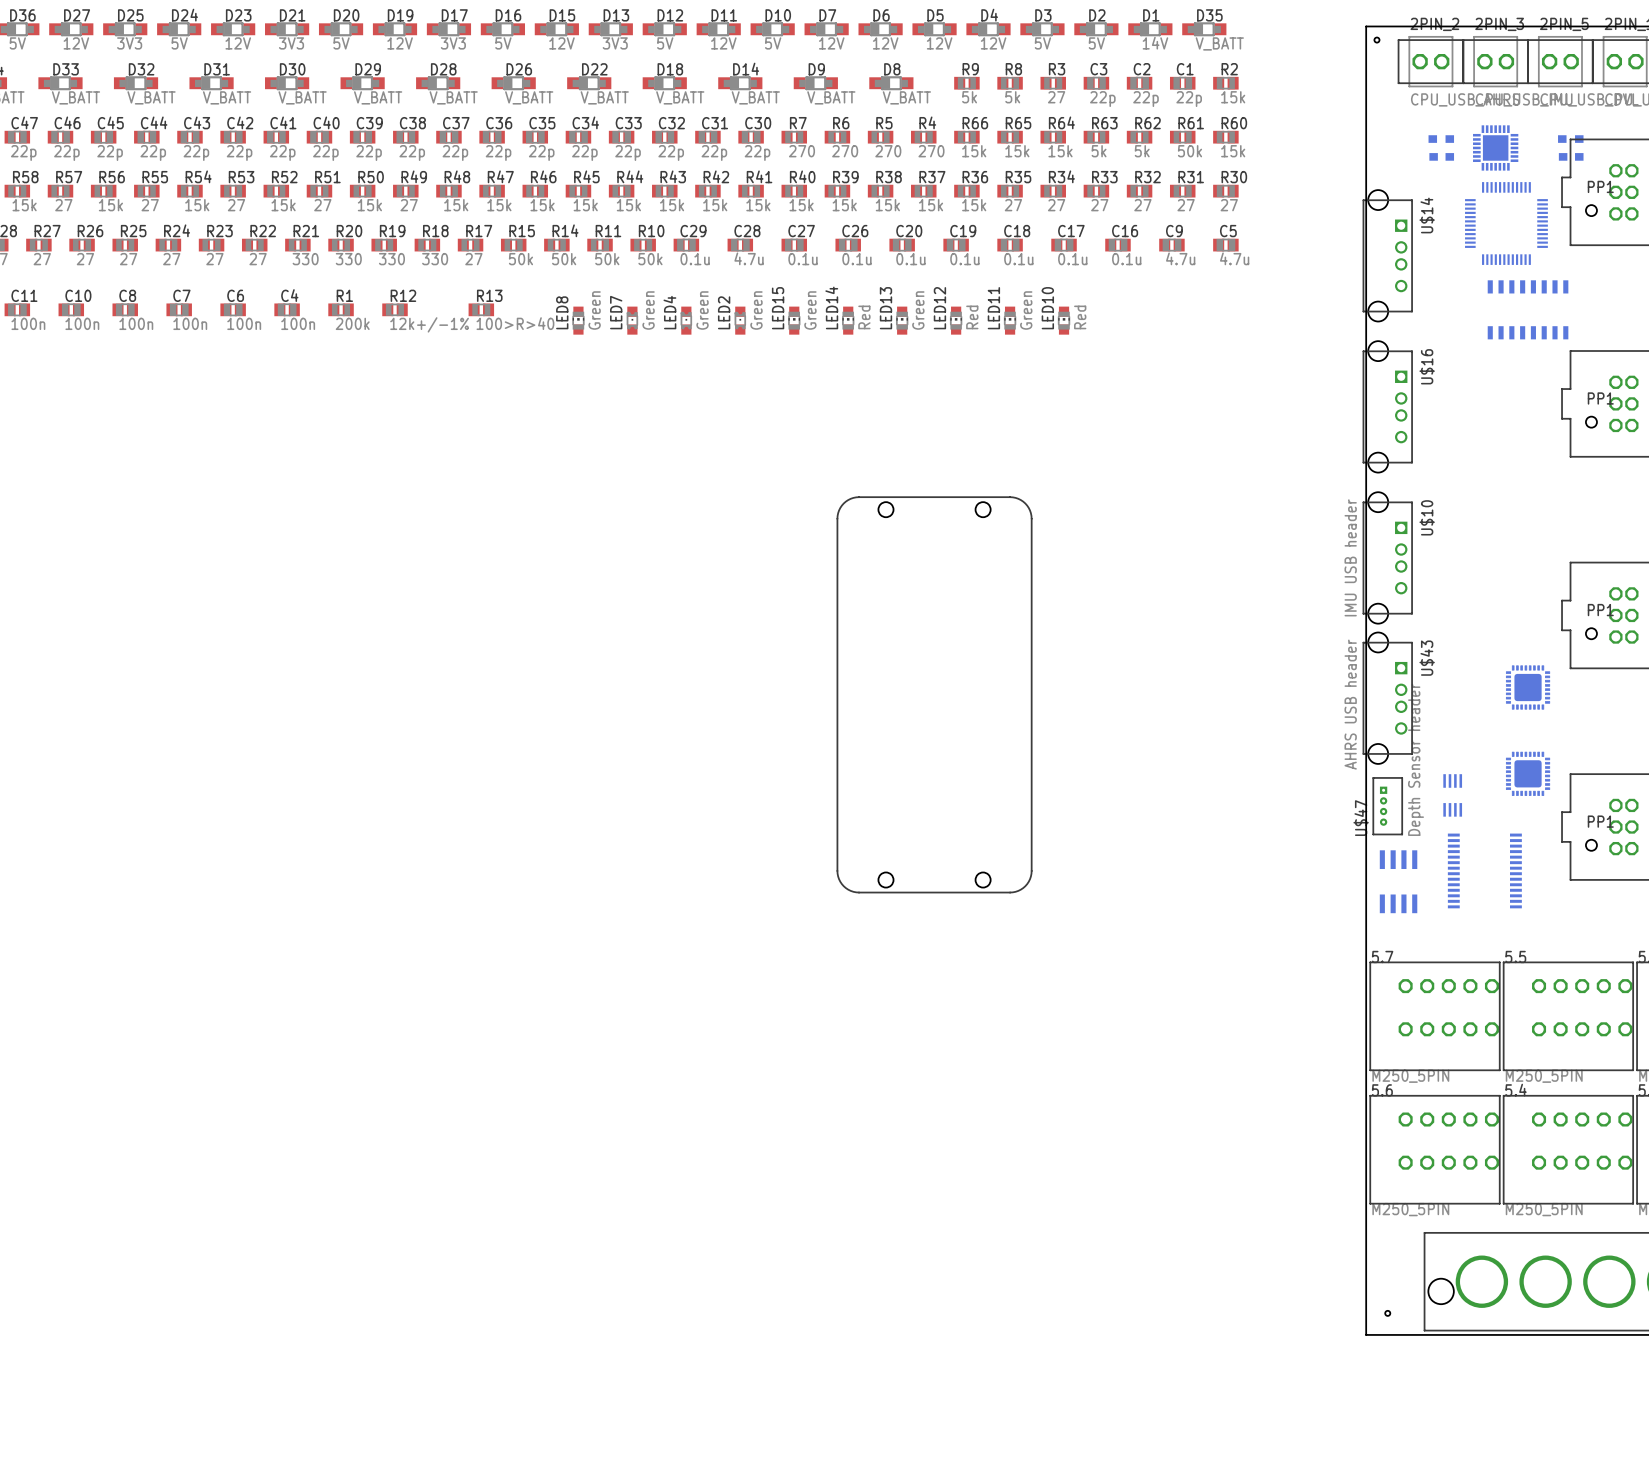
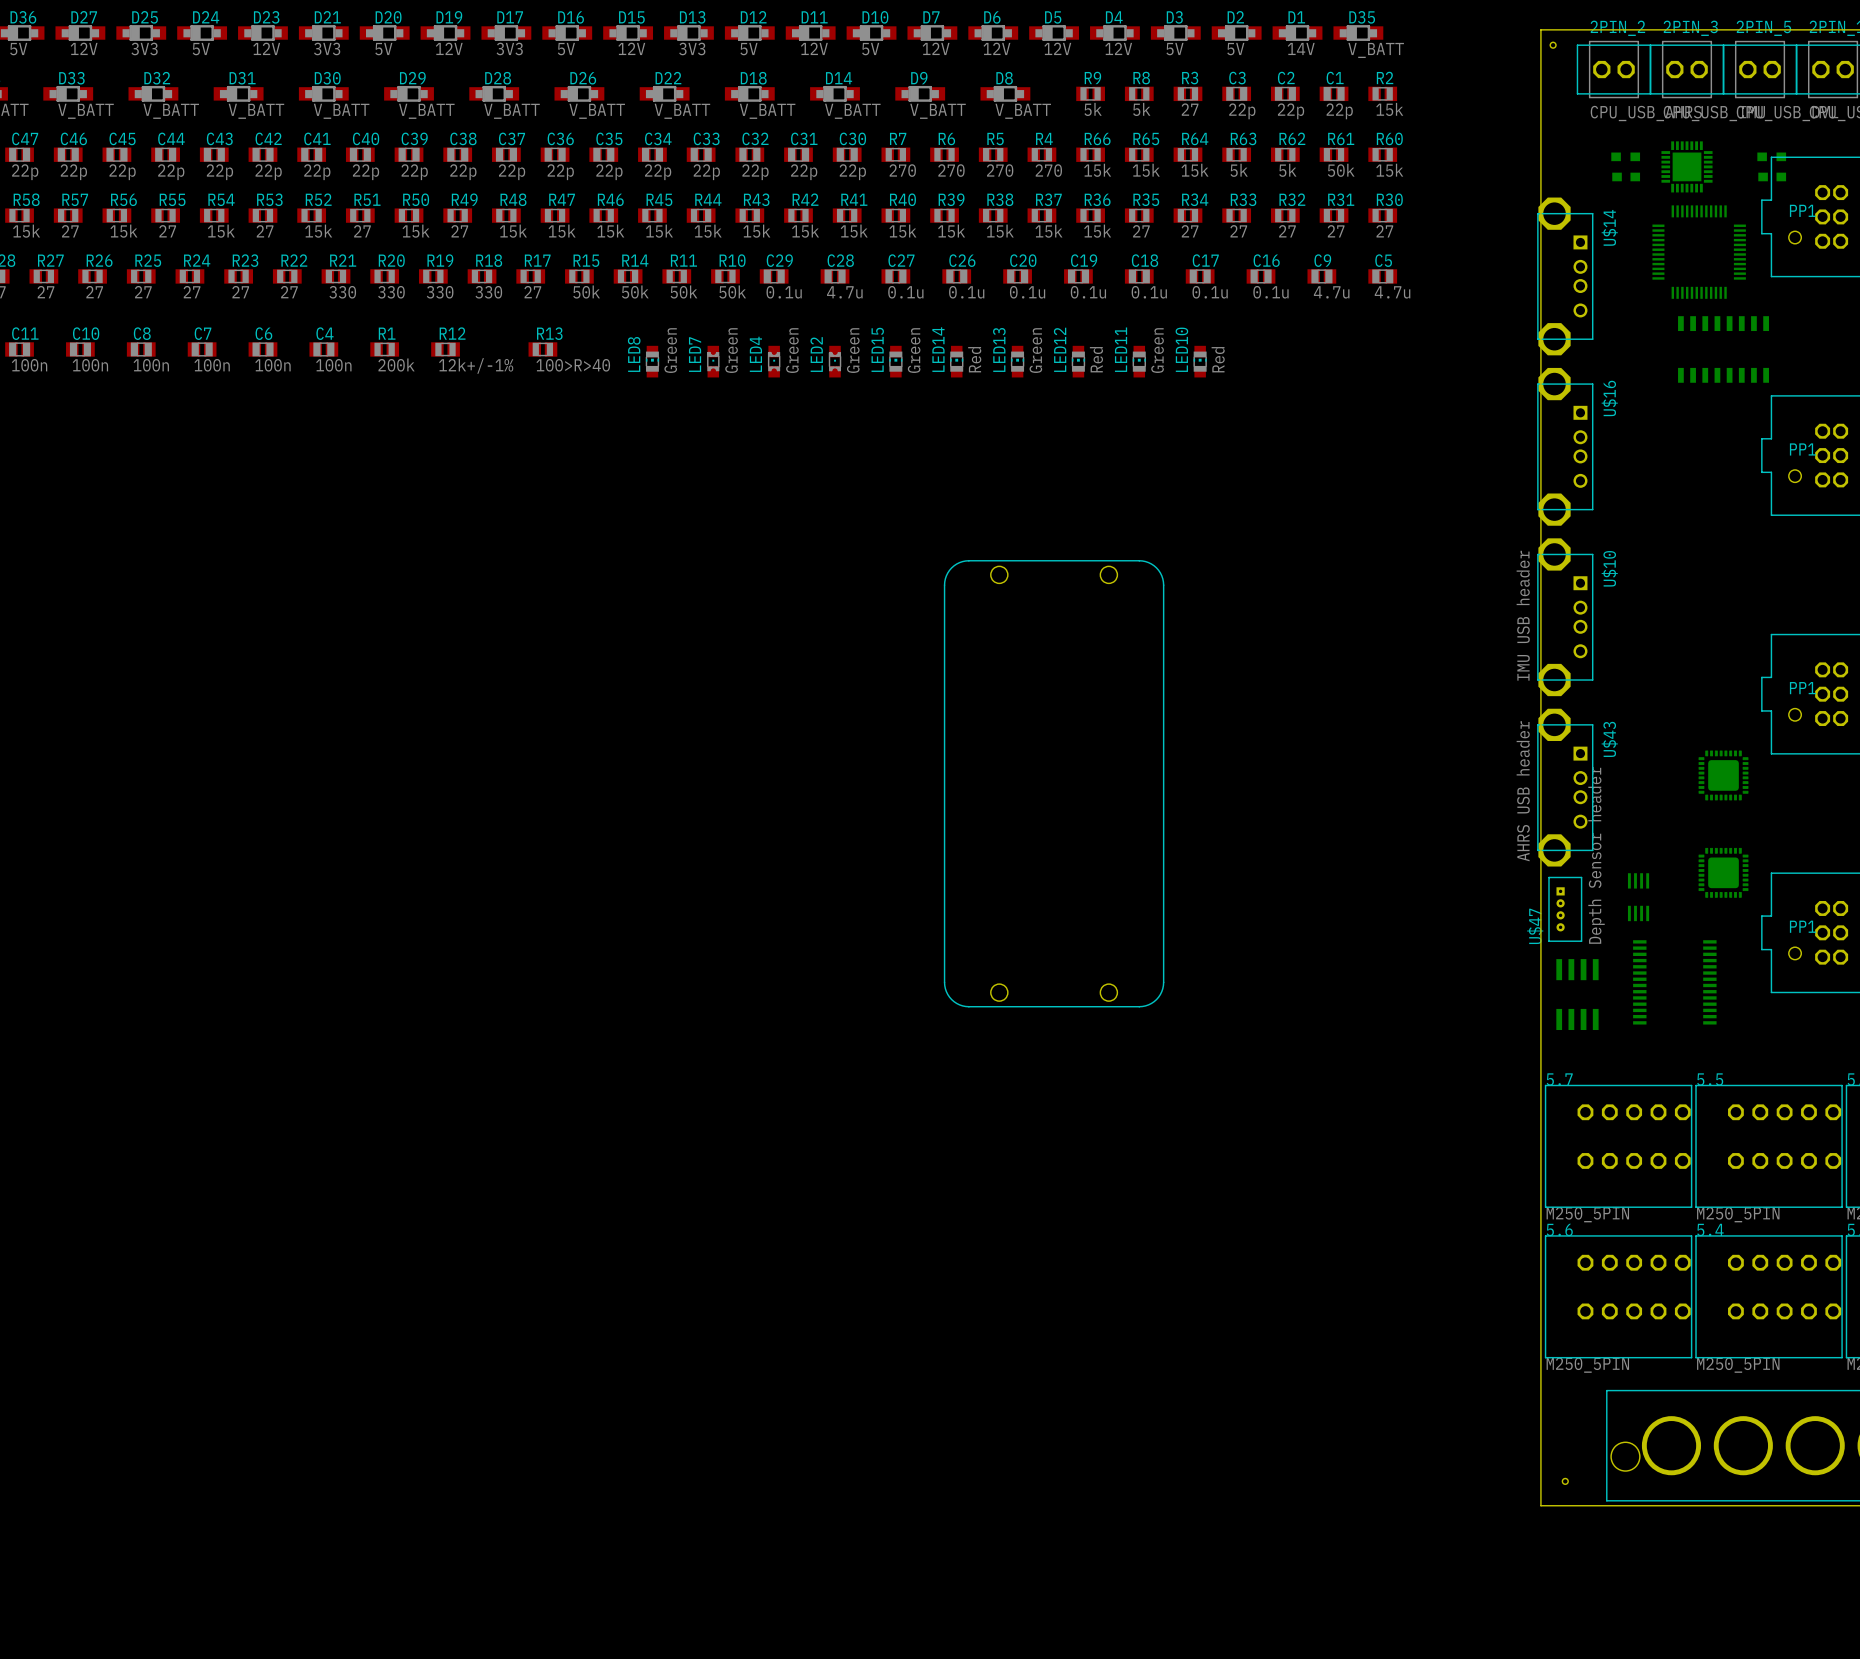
U$14 footprint: [1362, 190, 1413, 322] -> [1537, 197, 1594, 356]
U$16 footprint: [1362, 341, 1413, 473] -> [1537, 367, 1594, 526]
U$10 footprint: [1362, 492, 1413, 624] -> [1537, 538, 1594, 697]
U$43 footprint: [1362, 632, 1413, 764] -> [1537, 708, 1594, 867]

